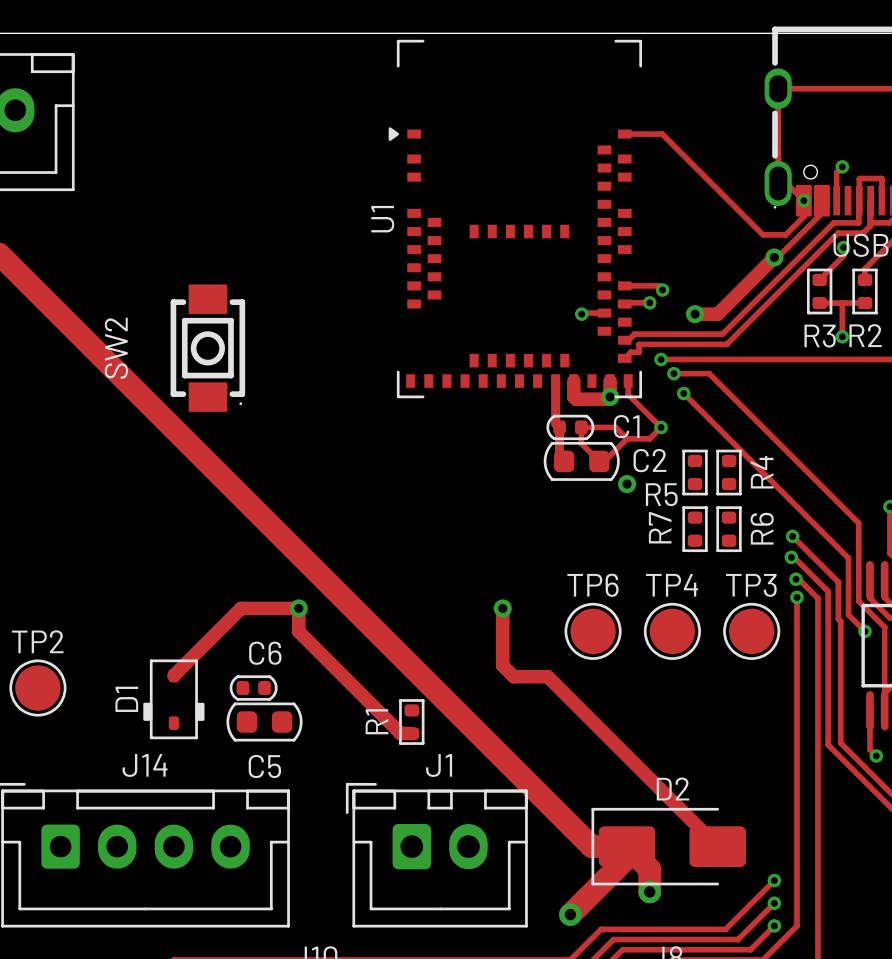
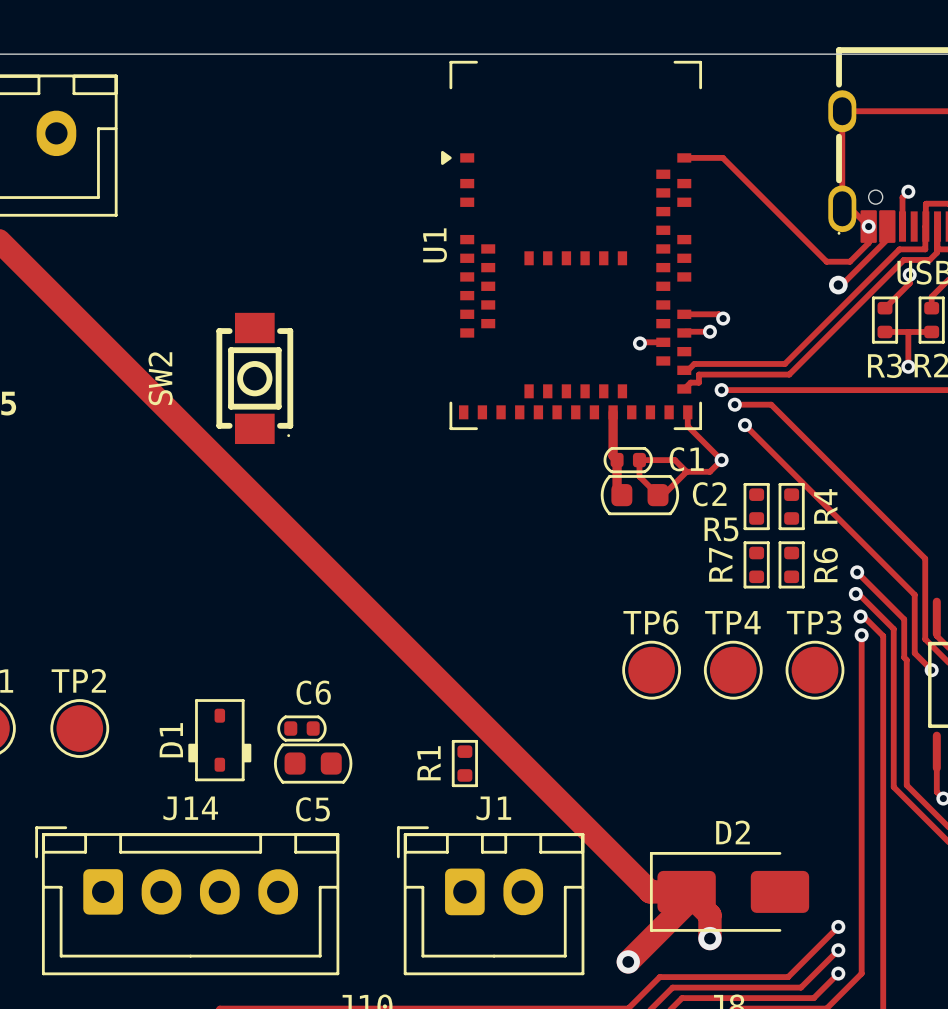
track: (774, 257) (717, 314) (695, 314) -> none
via: (695, 314) -> none
track: (573, 381) (573, 396) (576, 399) (607, 399) (610, 396) (610, 381) -> none
via: (610, 396) -> none
via: (627, 484) -> none
via: (298, 608) -> none
track: (502, 608) (502, 665) (513, 676) (547, 676) (717, 846) -> none
via: (502, 608) -> none
track: (173, 675) (241, 608) (298, 608) (298, 631) (400, 733) (411, 733) -> none

